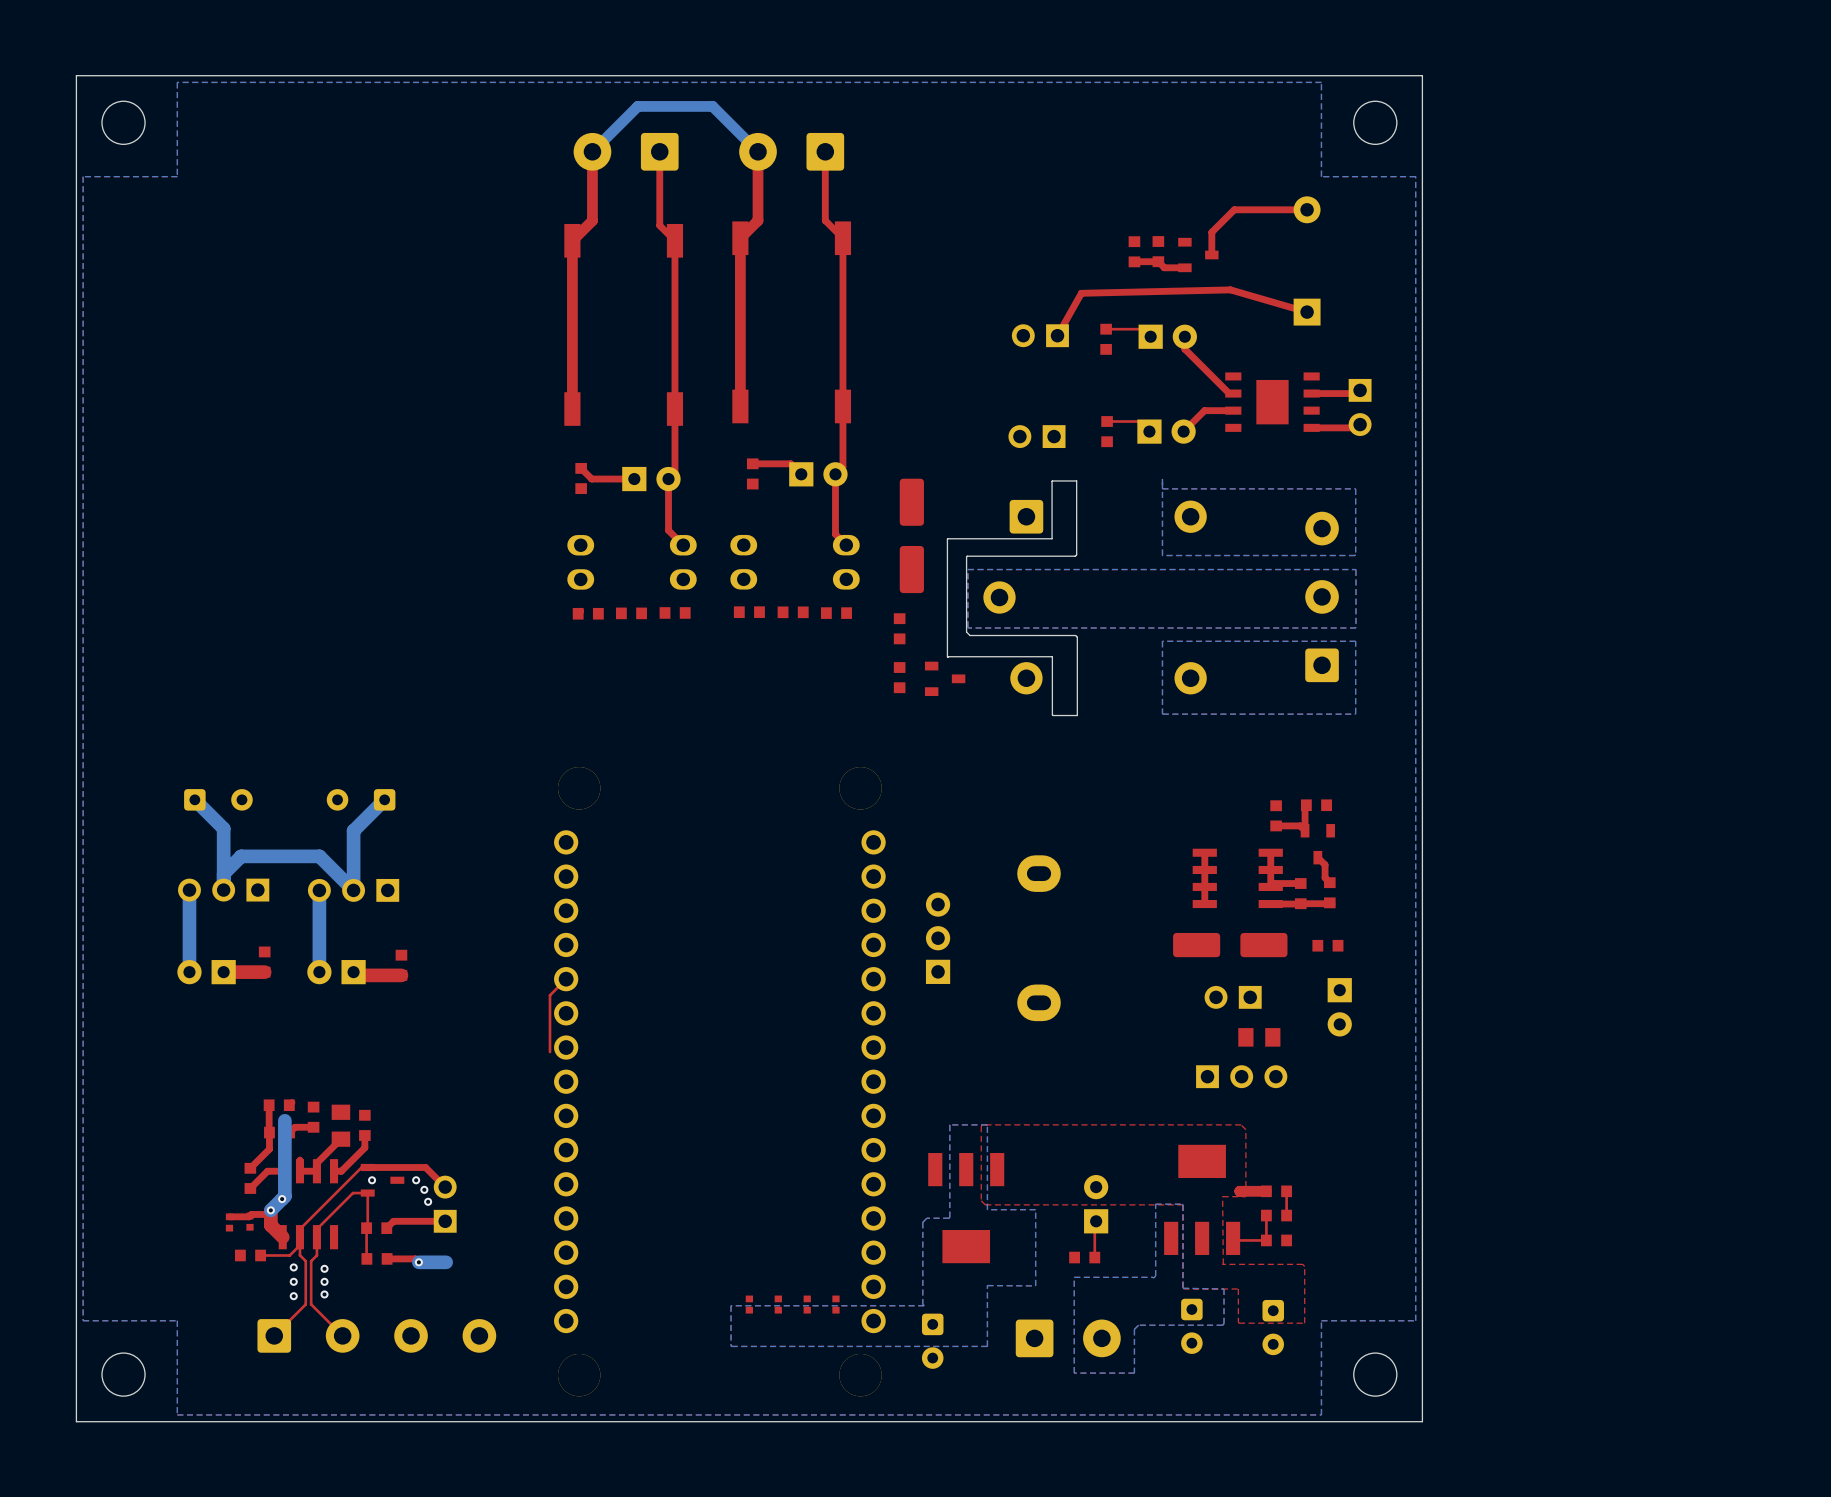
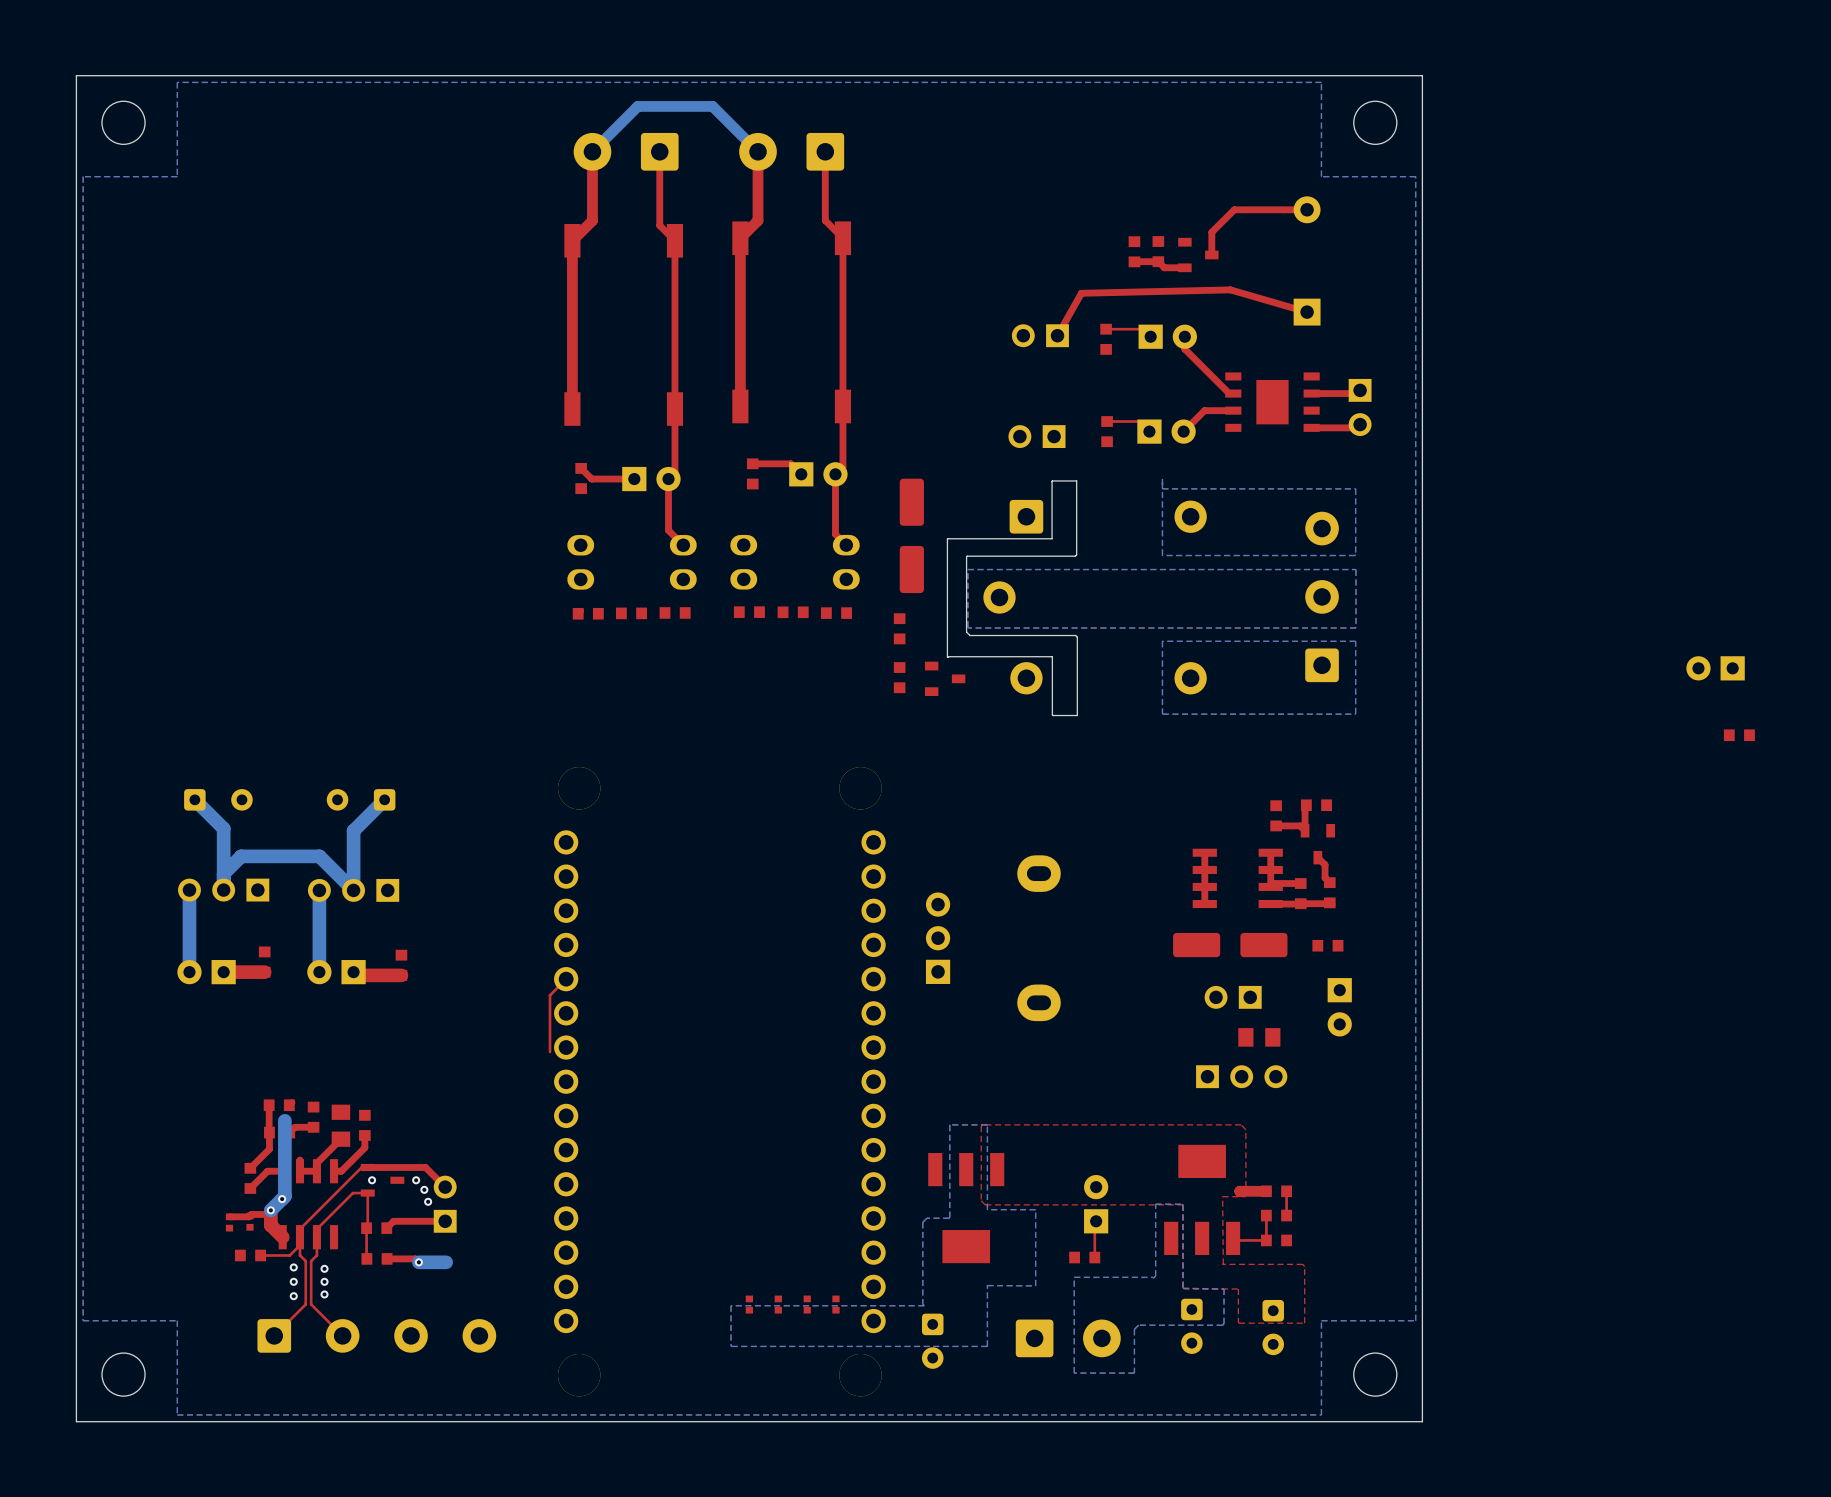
part: none -> (1715, 668)
part: none -> (1739, 735)

